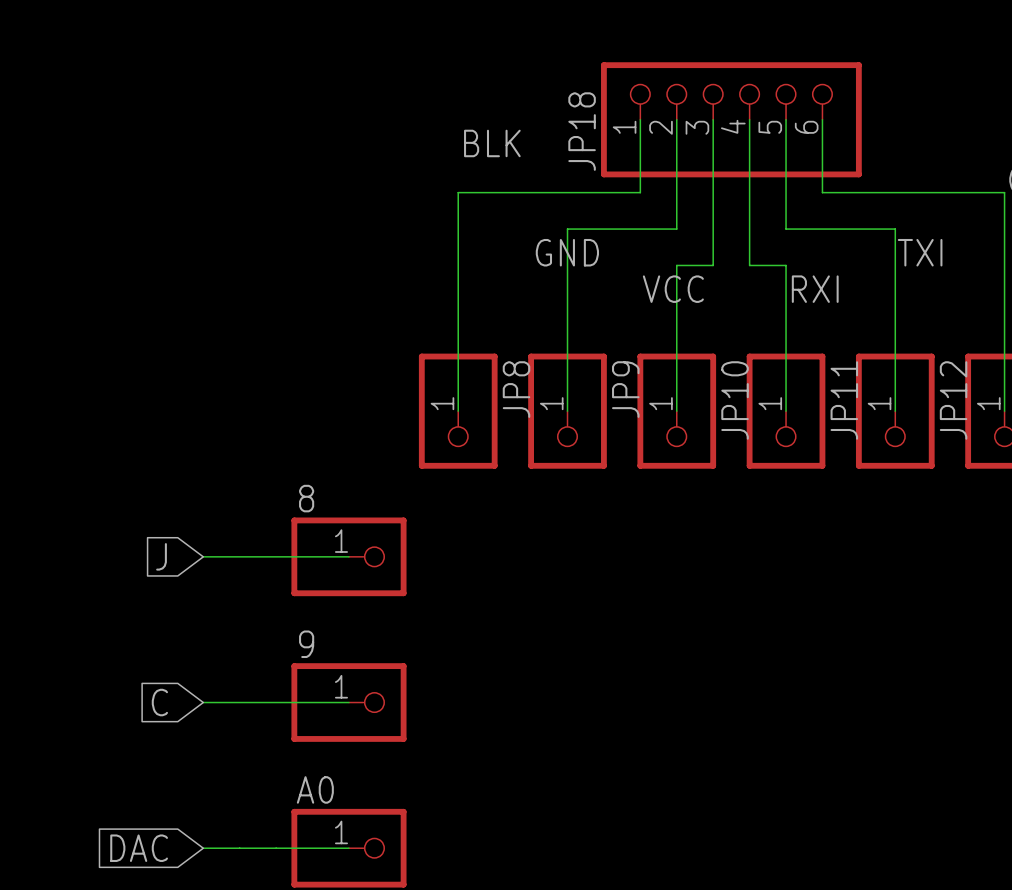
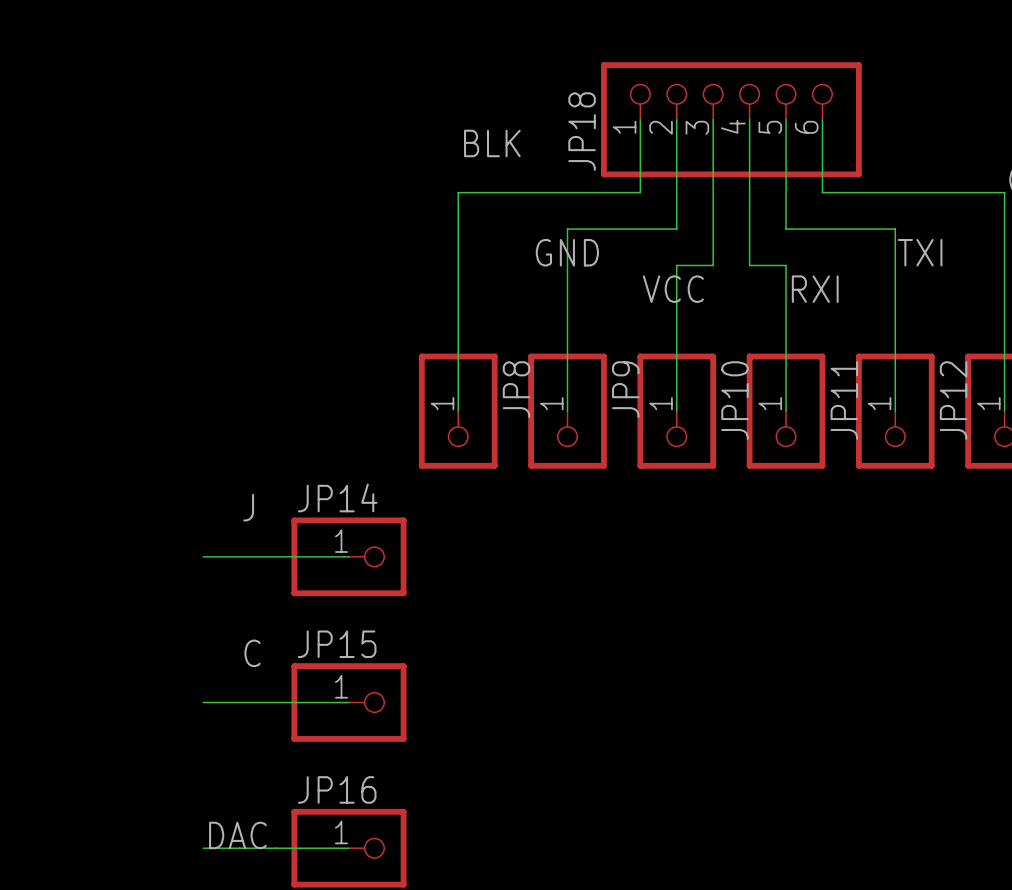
8 name: 8 (306, 498) -> JP14 (337, 497)
label: none -> J (248, 507)
global label: J (161, 556) -> none
9 name: 9 (306, 644) -> JP15 (337, 644)
label: none -> C (252, 653)
global label: C (159, 702) -> none
A0 name: A0 (315, 789) -> JP16 (337, 789)
label: none -> DAC (237, 835)
global label: DAC (139, 848) -> none

